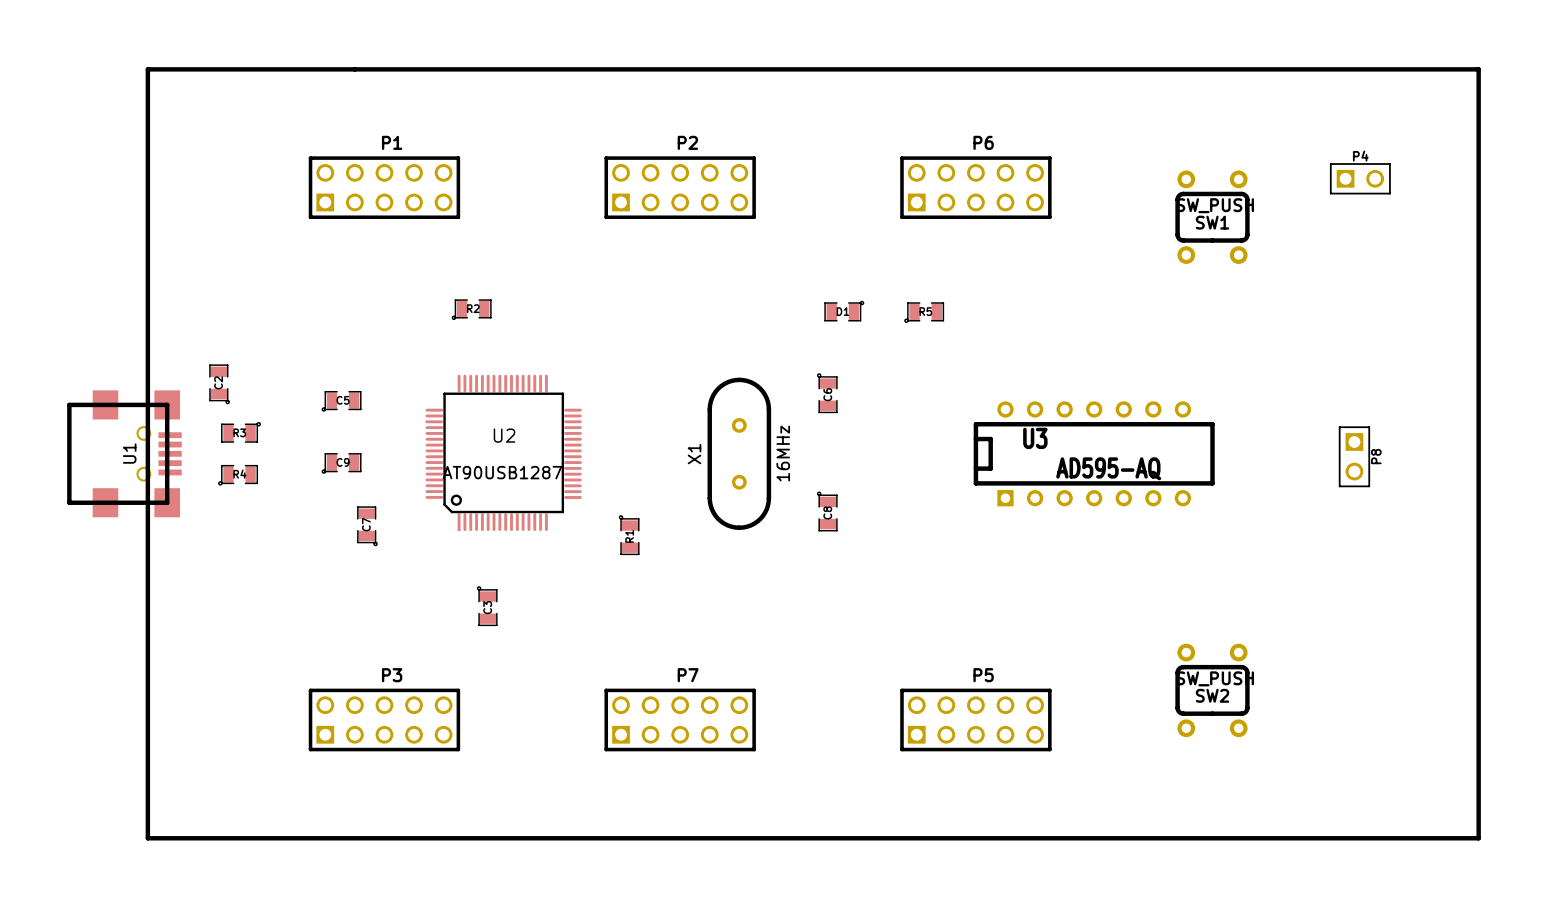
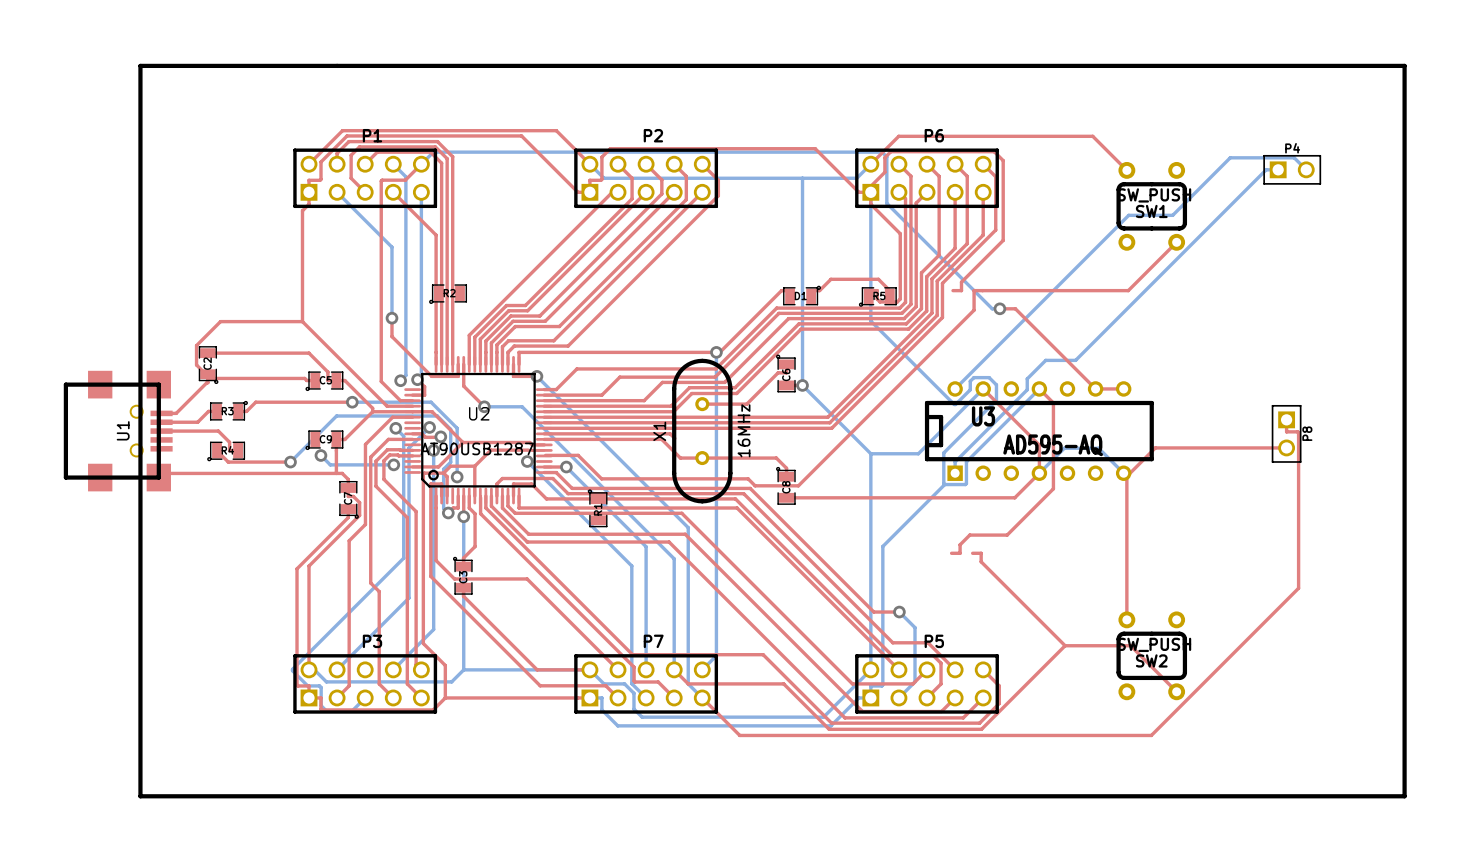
top track: none -> (309, 164) (342, 130) (556, 130) (589, 164)
top track: none -> (337, 164) (337, 153) (348, 141) (437, 141) (452, 156) (452, 364)
top track: none -> (365, 164) (377, 152) (430, 152) (441, 163) (441, 364)
bottom track: none -> (393, 164) (405, 176) (405, 375) (400, 380)
bottom track: none -> (421, 164) (433, 152) (882, 152) (886, 156) (886, 203) (992, 308) (999, 308)
top track: none -> (421, 164) (405, 180) (381, 181) (381, 381) (400, 400) (412, 400)
bottom track: none -> (589, 164) (603, 178) (856, 178) (870, 164)
top track: none -> (618, 164) (632, 178) (632, 198) (525, 305) (506, 305) (474, 337) (474, 364)
top track: none -> (646, 164) (661, 179) (661, 193) (539, 316) (510, 316) (485, 341) (485, 364)
top track: none -> (674, 164) (686, 176) (686, 199) (559, 326) (515, 326) (496, 344) (496, 364)
top track: none -> (702, 164) (718, 180) (718, 195) (568, 346) (514, 346) (507, 352) (507, 364)
top track: none -> (870, 164) (898, 136) (1092, 136) (1126, 170)
top track: none -> (898, 164) (910, 176) (910, 304) (901, 313) (778, 313) (715, 377) (619, 377) (601, 395) (544, 395)
top track: none -> (927, 164) (939, 176) (939, 255) (921, 272) (921, 308) (906, 323) (798, 323) (735, 387) (689, 387) (671, 406) (544, 406)
top track: none -> (955, 164) (967, 176) (967, 243) (931, 278) (931, 313) (827, 417) (544, 417)
top track: none -> (983, 164) (995, 176) (995, 230) (942, 283) (942, 317) (831, 428) (544, 428)
bottom track: none -> (1278, 169) (1266, 169) (1075, 360) (1045, 360) (1027, 378) (1027, 389) (955, 461) (955, 473)
bottom track: none -> (1306, 169) (1294, 157) (1230, 157) (1172, 215) (1128, 215) (955, 388)
bottom track: none -> (802, 178) (802, 385) (870, 453)
bottom track: none -> (337, 192) (391, 247) (391, 318)
top track: none -> (365, 192) (351, 178) (351, 155) (359, 146) (435, 146) (447, 158) (447, 364)
top track: none -> (393, 192) (436, 235) (436, 364)
bottom track: none -> (421, 192) (421, 375) (417, 379)
top track: none -> (618, 192) (612, 192) (469, 335) (469, 364)
top track: none -> (646, 192) (527, 310) (508, 310) (480, 339) (480, 364)
top track: none -> (674, 192) (545, 321) (513, 321) (491, 342) (491, 364)
top track: none -> (702, 192) (553, 340) (508, 340) (502, 346) (502, 364)
top track: none -> (864, 192) (884, 172) (884, 157) (890, 151) (994, 151) (1003, 160) (1003, 240) (961, 282) (961, 290) (953, 290)
bottom track: none -> (870, 192) (870, 321) (954, 404) (970, 389) (970, 381) (973, 377) (989, 377) (996, 384) (996, 400) (943, 452) (944, 484)
top track: none -> (898, 192) (905, 198) (905, 302) (899, 308) (776, 308) (715, 368) (576, 368) (556, 389) (544, 389)
top track: none -> (927, 192) (916, 203) (916, 306) (904, 318) (788, 318) (724, 382) (662, 382) (644, 400) (544, 400)
top track: none -> (955, 192) (955, 248) (926, 276) (926, 310) (908, 329) (801, 329) (736, 393) (691, 393) (673, 411) (544, 411)
top track: none -> (983, 192) (983, 235) (937, 281) (937, 315) (829, 422) (544, 422)
top track: none -> (1176, 242) (1128, 290) (974, 290) (974, 310) (798, 485) (755, 485) (748, 478) (601, 478) (578, 455) (545, 455)
top track: none -> (790, 290) (781, 290) (719, 352) (519, 352) (519, 364)
top track: none -> (811, 290) (819, 290) (830, 279) (878, 279) (889, 290)
top track: none -> (868, 290) (877, 290) (877, 299) (880, 301) (897, 301) (900, 299) (900, 233) (870, 204) (870, 192) (858, 192) (815, 148) (610, 148) (601, 157) (601, 179) (589, 180) (589, 192) (577, 192) (521, 135) (347, 135) (321, 162) (321, 179) (309, 180) (309, 204) (302, 210) (302, 321)
top track: none -> (999, 308) (1015, 308) (1095, 388) (1123, 388)
via: none -> (999, 308)
top track: none -> (391, 318) (391, 336) (431, 376) (458, 376) (458, 364)
via: none -> (391, 318)
top track: none -> (302, 321) (387, 406) (412, 406)
top track: none -> (302, 321) (220, 321) (196, 345) (196, 364) (207, 376)
bottom track: none -> (716, 352) (716, 655) (702, 669)
via: none -> (716, 352)
top track: none -> (207, 353) (309, 353) (327, 372) (327, 380) (344, 380) (372, 408) (372, 411)
top track: none -> (463, 364) (463, 386) (484, 406)
top track: none -> (513, 364) (513, 376) (536, 376)
top track: none -> (786, 364) (786, 372) (778, 372) (746, 404) (702, 404)
top track: none -> (207, 374) (207, 382) (176, 413) (161, 413)
bottom track: none -> (536, 376) (688, 527) (688, 683) (702, 697)
via: none -> (536, 376)
top track: none -> (207, 378) (304, 378) (306, 380) (315, 380)
top track: none -> (417, 379) (424, 386) (424, 395) (412, 395)
via: none -> (417, 379)
via: none -> (400, 380)
via: none -> (802, 385)
bottom track: none -> (983, 388) (918, 453) (870, 453)
top track: none -> (983, 388) (1039, 445) (1039, 473) (1014, 497) (786, 497)
bottom track: none -> (1039, 388) (966, 461) (966, 483) (944, 484)
top track: none -> (1039, 388) (1053, 403) (1053, 488) (1007, 535) (969, 535) (960, 544) (960, 553) (951, 553)
bottom track: none -> (352, 402) (431, 402) (457, 428) (457, 477)
top track: none -> (352, 402) (255, 402) (246, 411) (238, 411)
via: none -> (352, 402)
bottom track: none -> (484, 406) (522, 406) (674, 558) (674, 669)
via: none -> (484, 406)
top track: none -> (217, 411) (208, 411) (197, 422) (161, 422)
top track: none -> (372, 411) (432, 411) (462, 442)
top track: none -> (372, 411) (344, 439) (336, 439) (336, 473)
top track: none -> (412, 417) (392, 417) (365, 444) (365, 524) (349, 540) (349, 685) (337, 697)
top track: none -> (1286, 419) (1286, 431) (1298, 432) (1298, 588) (1151, 735) (739, 735) (702, 697)
bottom track: none -> (429, 427) (409, 448) (409, 597) (337, 669)
via: none -> (429, 427)
bottom track: none -> (395, 428) (403, 436) (403, 558) (292, 669) (307, 685) (321, 687) (321, 705) (326, 710) (352, 710) (365, 697)
via: none -> (395, 428)
top track: none -> (161, 431) (218, 431) (229, 442) (229, 450) (238, 450)
top track: none -> (412, 433) (422, 433) (425, 437) (440, 436)
top track: none -> (544, 433) (670, 433) (674, 438)
via: none -> (440, 436)
top track: none -> (412, 439) (388, 439) (370, 457) (370, 583) (379, 591) (379, 683) (393, 697)
top track: none -> (544, 439) (661, 439) (680, 458) (776, 458) (786, 468) (786, 476)
top track: none -> (462, 442) (438, 466) (412, 466)
top track: none -> (462, 442) (529, 442) (532, 444) (544, 444)
top track: none -> (1286, 447) (1155, 447) (1126, 476)
top track: none -> (217, 450) (228, 462) (290, 462)
top track: none -> (412, 450) (387, 449) (375, 461) (375, 486) (407, 517) (407, 683) (421, 697)
bottom track: none -> (433, 450) (433, 629) (393, 669)
via: none -> (433, 450)
top track: none -> (544, 450) (490, 450) (474, 466)
bottom track: none -> (870, 453) (870, 669) (823, 717) (642, 717) (633, 709) (633, 693) (624, 683) (603, 683) (589, 669) (463, 669)
bottom track: none -> (320, 455) (330, 464) (393, 464)
via: none -> (320, 455)
top track: none -> (412, 455) (389, 455) (383, 460) (383, 479) (416, 511) (416, 664) (421, 669)
bottom track: none -> (527, 461) (631, 565) (631, 683) (646, 697)
via: none -> (527, 461)
bottom track: none -> (290, 462) (336, 416) (437, 416) (450, 429) (450, 462) (443, 469) (443, 508) (448, 512)
via: none -> (290, 462)
via: none -> (393, 464)
top track: none -> (474, 466) (450, 466) (443, 473)
top track: none -> (474, 466) (474, 496)
top track: none -> (544, 467) (566, 467)
bottom track: none -> (566, 467) (646, 546) (646, 669)
via: none -> (566, 467)
top track: none -> (544, 472) (556, 472) (572, 488) (750, 488) (873, 612) (899, 612)
top track: none -> (443, 473) (447, 476) (447, 496)
top track: none -> (443, 473) (423, 474) (423, 643) (445, 665) (445, 697)
bottom track: none -> (1039, 473) (1064, 448) (1098, 448) (1123, 473)
top track: none -> (1126, 476) (1126, 619)
top track: none -> (158, 477) (161, 473) (342, 473) (348, 479) (348, 496) (353, 496) (359, 502) (359, 515) (309, 566) (309, 669)
via: none -> (457, 477)
top track: none -> (430, 484) (430, 576) (540, 685) (605, 685) (618, 697)
top track: none -> (430, 484) (441, 484) (441, 496)
bottom track: none -> (944, 484) (882, 546) (882, 685) (870, 685) (870, 697) (858, 697) (830, 725) (617, 725) (601, 709) (601, 697) (589, 697)
top track: none -> (436, 496) (436, 560) (454, 578) (527, 578) (618, 669)
top track: none -> (458, 496) (458, 508) (453, 508) (448, 512)
top track: none -> (463, 496) (463, 516)
top track: none -> (469, 496) (469, 508) (475, 513) (475, 546) (463, 558) (463, 566)
top track: none -> (480, 496) (480, 513) (634, 667) (634, 681) (658, 682) (674, 697)
top track: none -> (485, 496) (485, 508) (632, 654) (763, 654) (831, 723) (979, 723) (999, 703) (999, 685) (983, 669)
top track: none -> (491, 496) (491, 506) (527, 542) (669, 542) (844, 717) (963, 717) (983, 697)
top track: none -> (496, 496) (496, 484) (502, 478) (552, 478) (568, 493) (743, 493) (892, 642) (928, 642) (955, 669)
top track: none -> (502, 496) (502, 508) (528, 534) (685, 534) (862, 711) (941, 711) (955, 697)
top track: none -> (507, 496) (507, 506) (515, 513) (681, 513) (852, 683) (912, 683) (927, 669)
top track: none -> (513, 496) (513, 484) (531, 484) (546, 498) (735, 498) (892, 655) (933, 655) (941, 663) (941, 683) (927, 697)
top track: none -> (519, 496) (519, 508) (737, 508) (898, 669)
top track: none -> (348, 509) (348, 517) (297, 568) (297, 685) (309, 685) (309, 697) (321, 697) (321, 709) (433, 709) (445, 697)
via: none -> (448, 512)
bottom track: none -> (463, 516) (463, 669)
via: none -> (463, 516)
top track: none -> (972, 553) (981, 553) (981, 561) (1065, 645)
top track: none -> (463, 587) (463, 596) (537, 669) (589, 669)
bottom track: none -> (899, 612) (915, 627) (915, 681) (898, 697)
via: none -> (899, 612)
top track: none -> (1065, 645) (981, 729) (829, 729) (783, 683) (688, 683) (674, 669)
top track: none -> (1065, 645) (1130, 645) (1176, 691)
bottom track: none -> (309, 669) (314, 669) (326, 681) (451, 681) (463, 669)
top track: none -> (445, 697) (589, 697)

